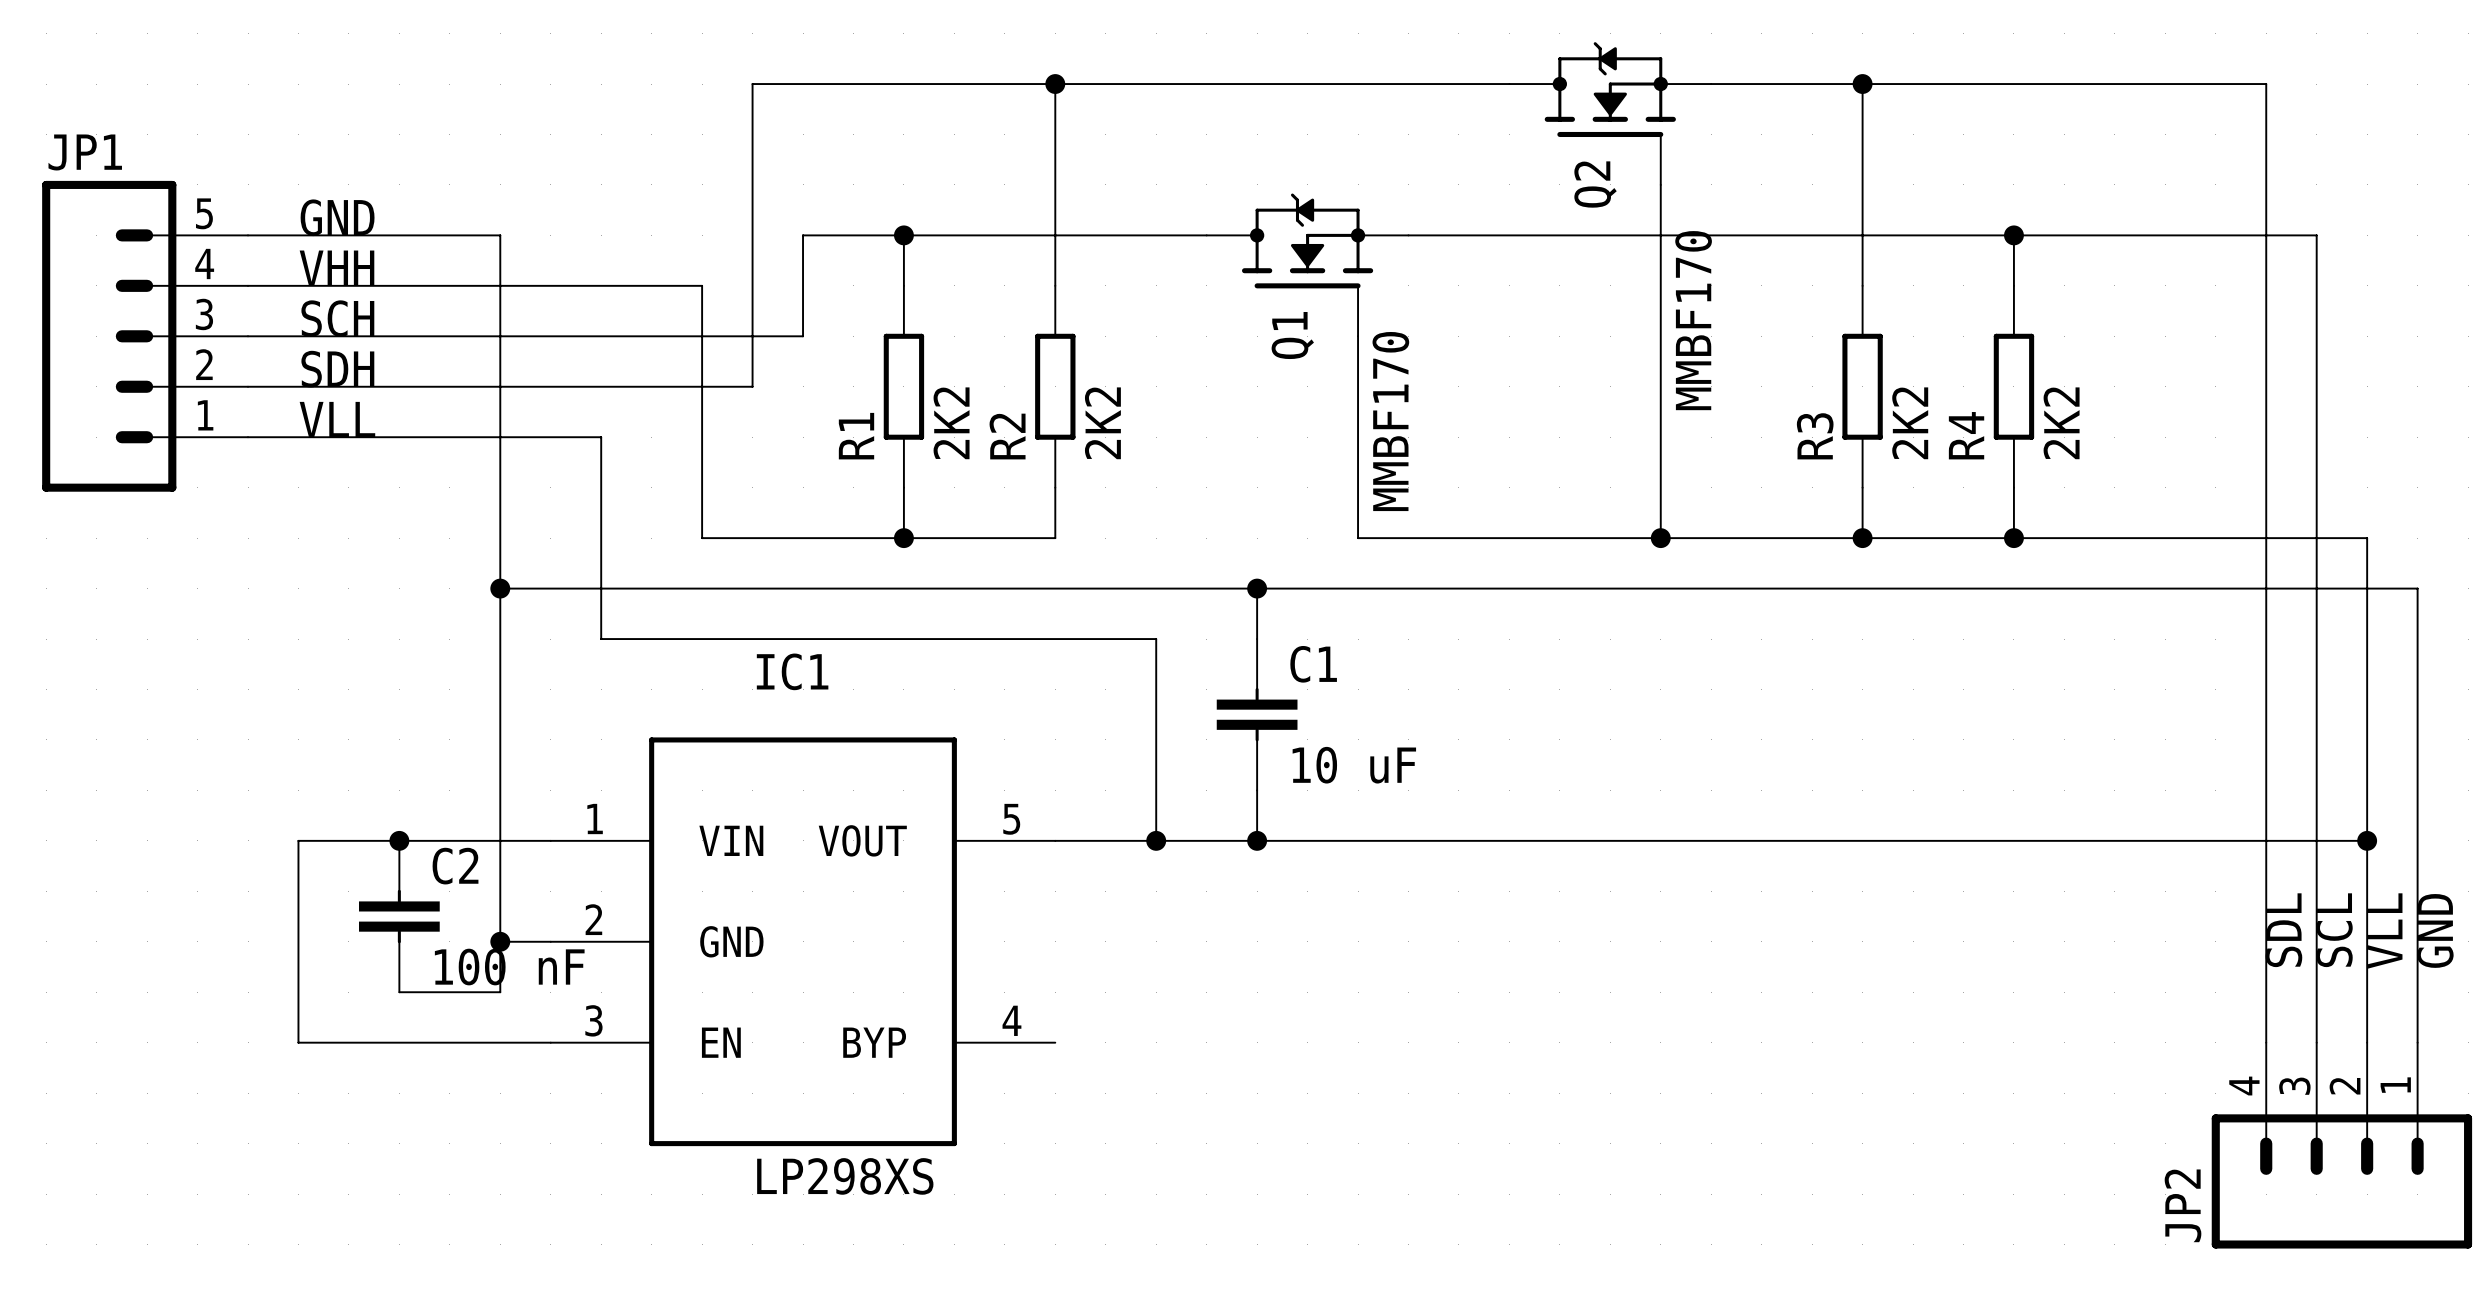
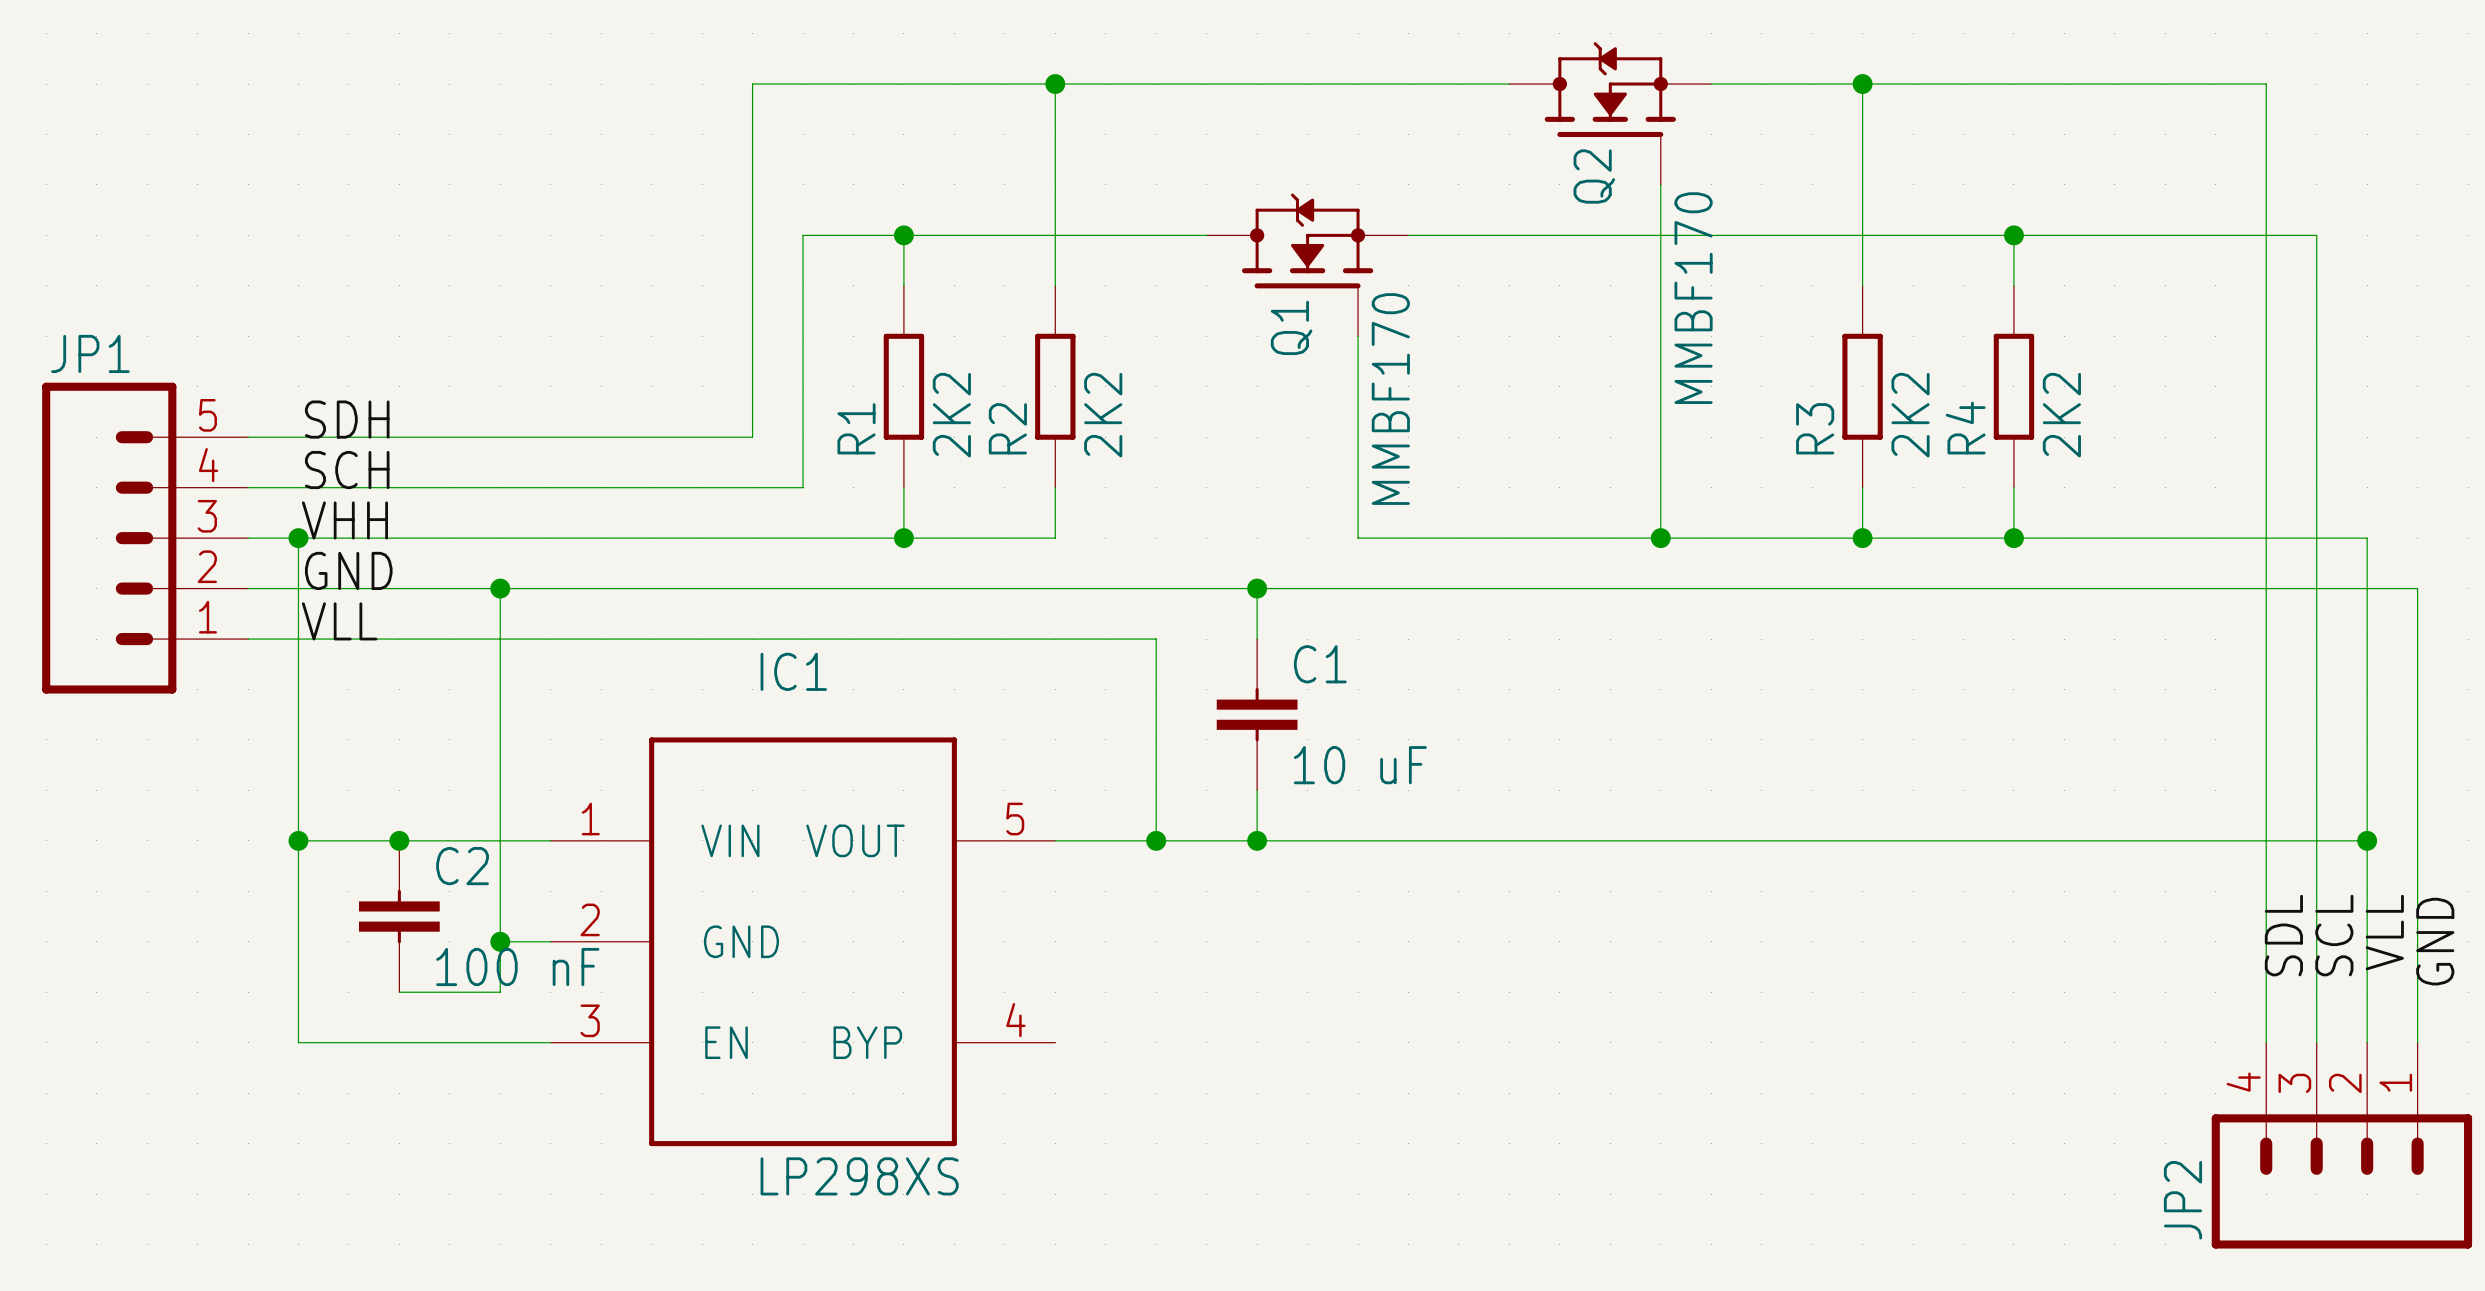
label position: GND (337, 217) -> GND (348, 570)
wire: (248, 235) (500, 235) (500, 588) -> (248, 588) (500, 588)
label position: VHH (336, 268) -> VHH (344, 520)
wire: (248, 285) (702, 285) (702, 538) -> (248, 538) (702, 538)
label position: SCH (337, 318) -> SCH (347, 470)
JP1 position: (145, 336) -> (145, 538)
wire: (248, 336) (803, 336) -> (248, 487) (803, 487) (803, 336)
label: SDH (337, 369) -> none
wire: (248, 386) (752, 386) -> none
label: VLL (337, 419) -> SDH (347, 419)
wire: (601, 437) (601, 639) -> (601, 437) (752, 437) (752, 386)
wire: none -> (298, 538) (298, 840)
junction: none -> (298, 538)
label: none -> VLL (339, 621)
wire: none -> (248, 639) (601, 639)
junction: none -> (298, 840)

